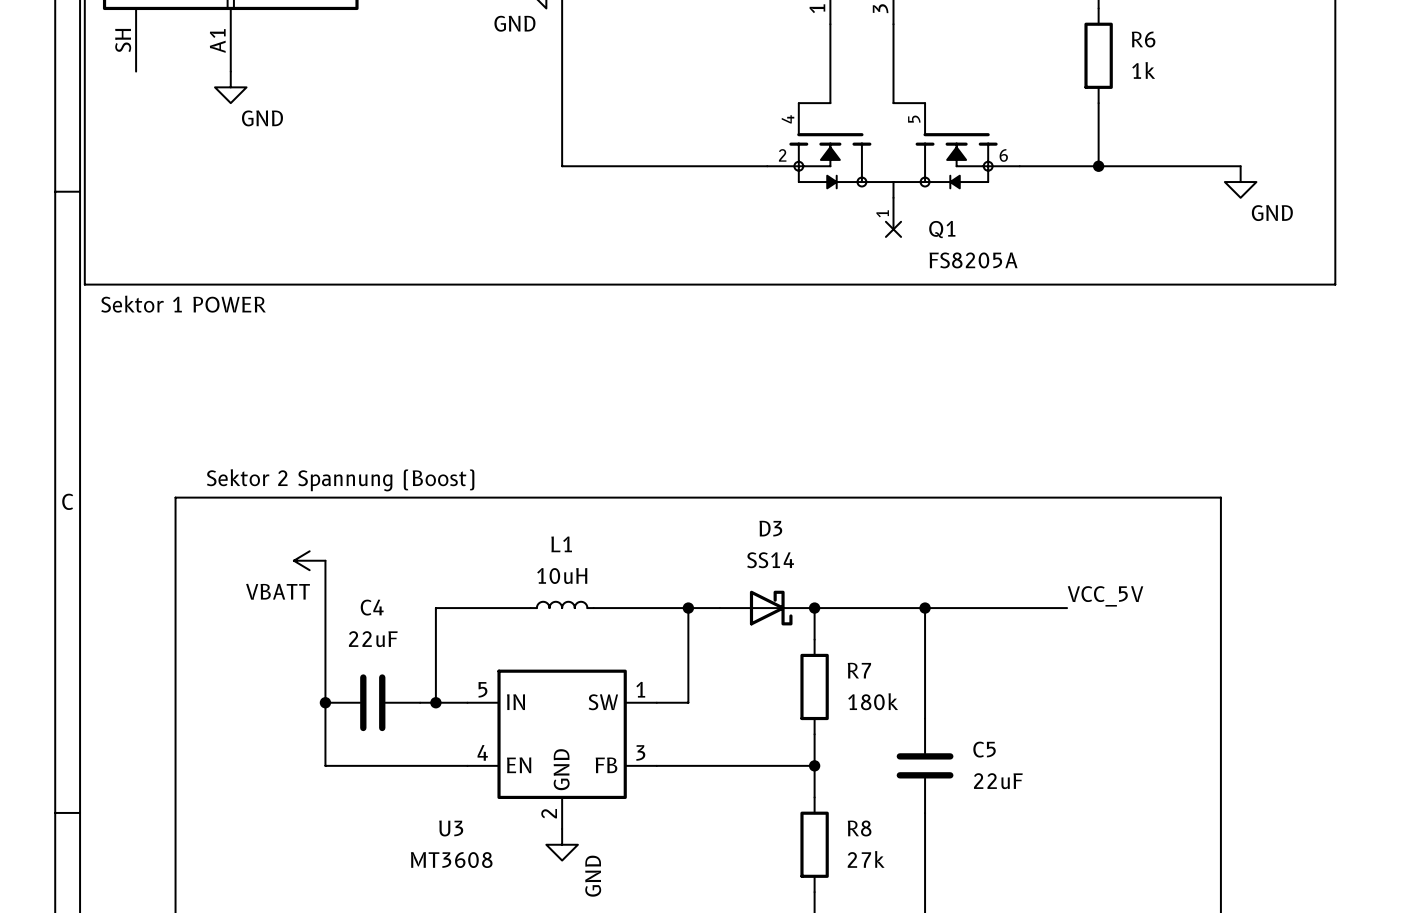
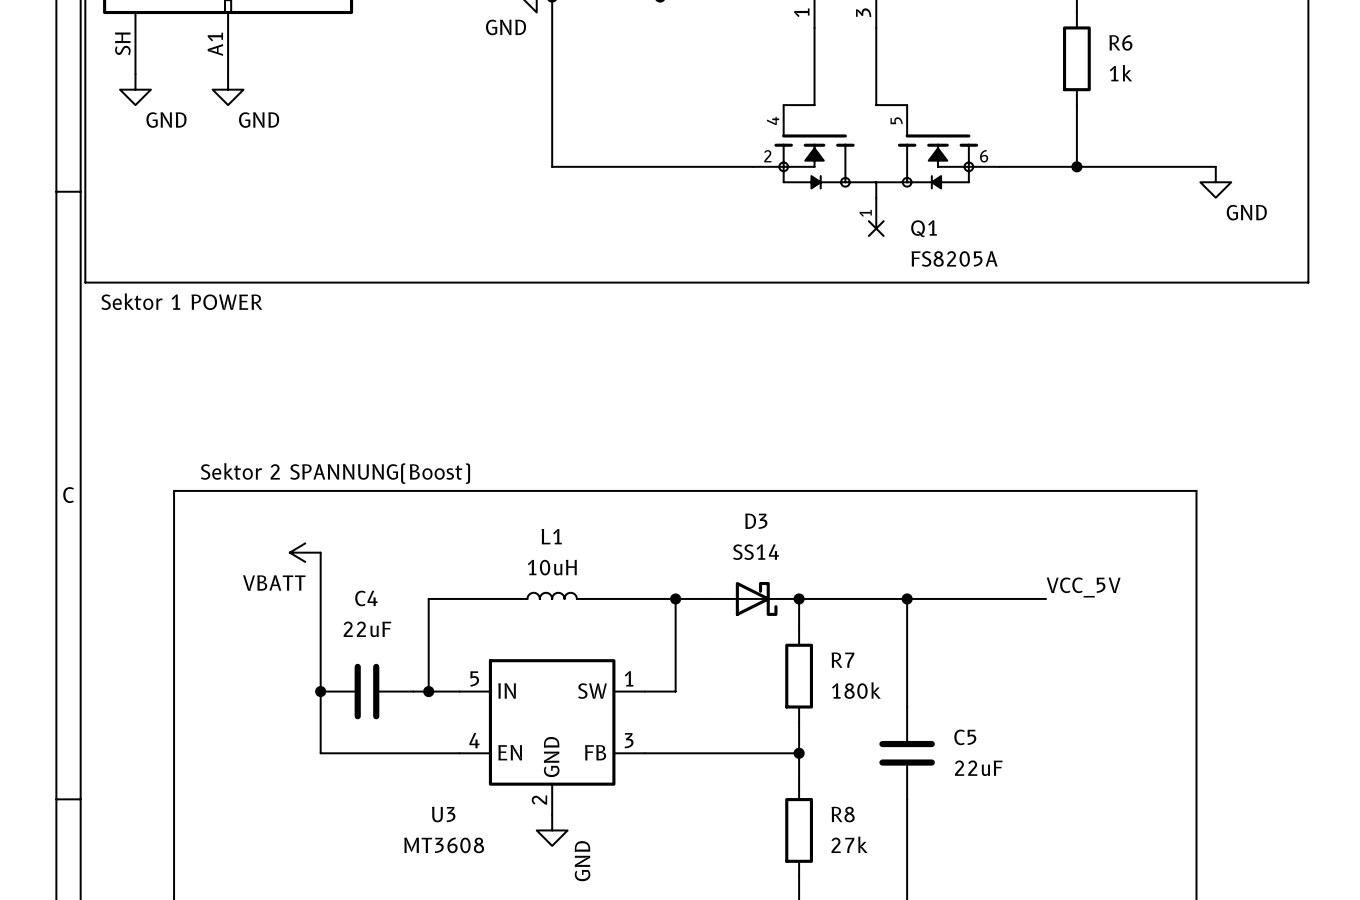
power symbol: none -> GND (135, 89)
text: Sektor 2 Spannung (Boost) (340, 480) -> Sektor 2 SPANNUNG(Boost) (335, 473)

